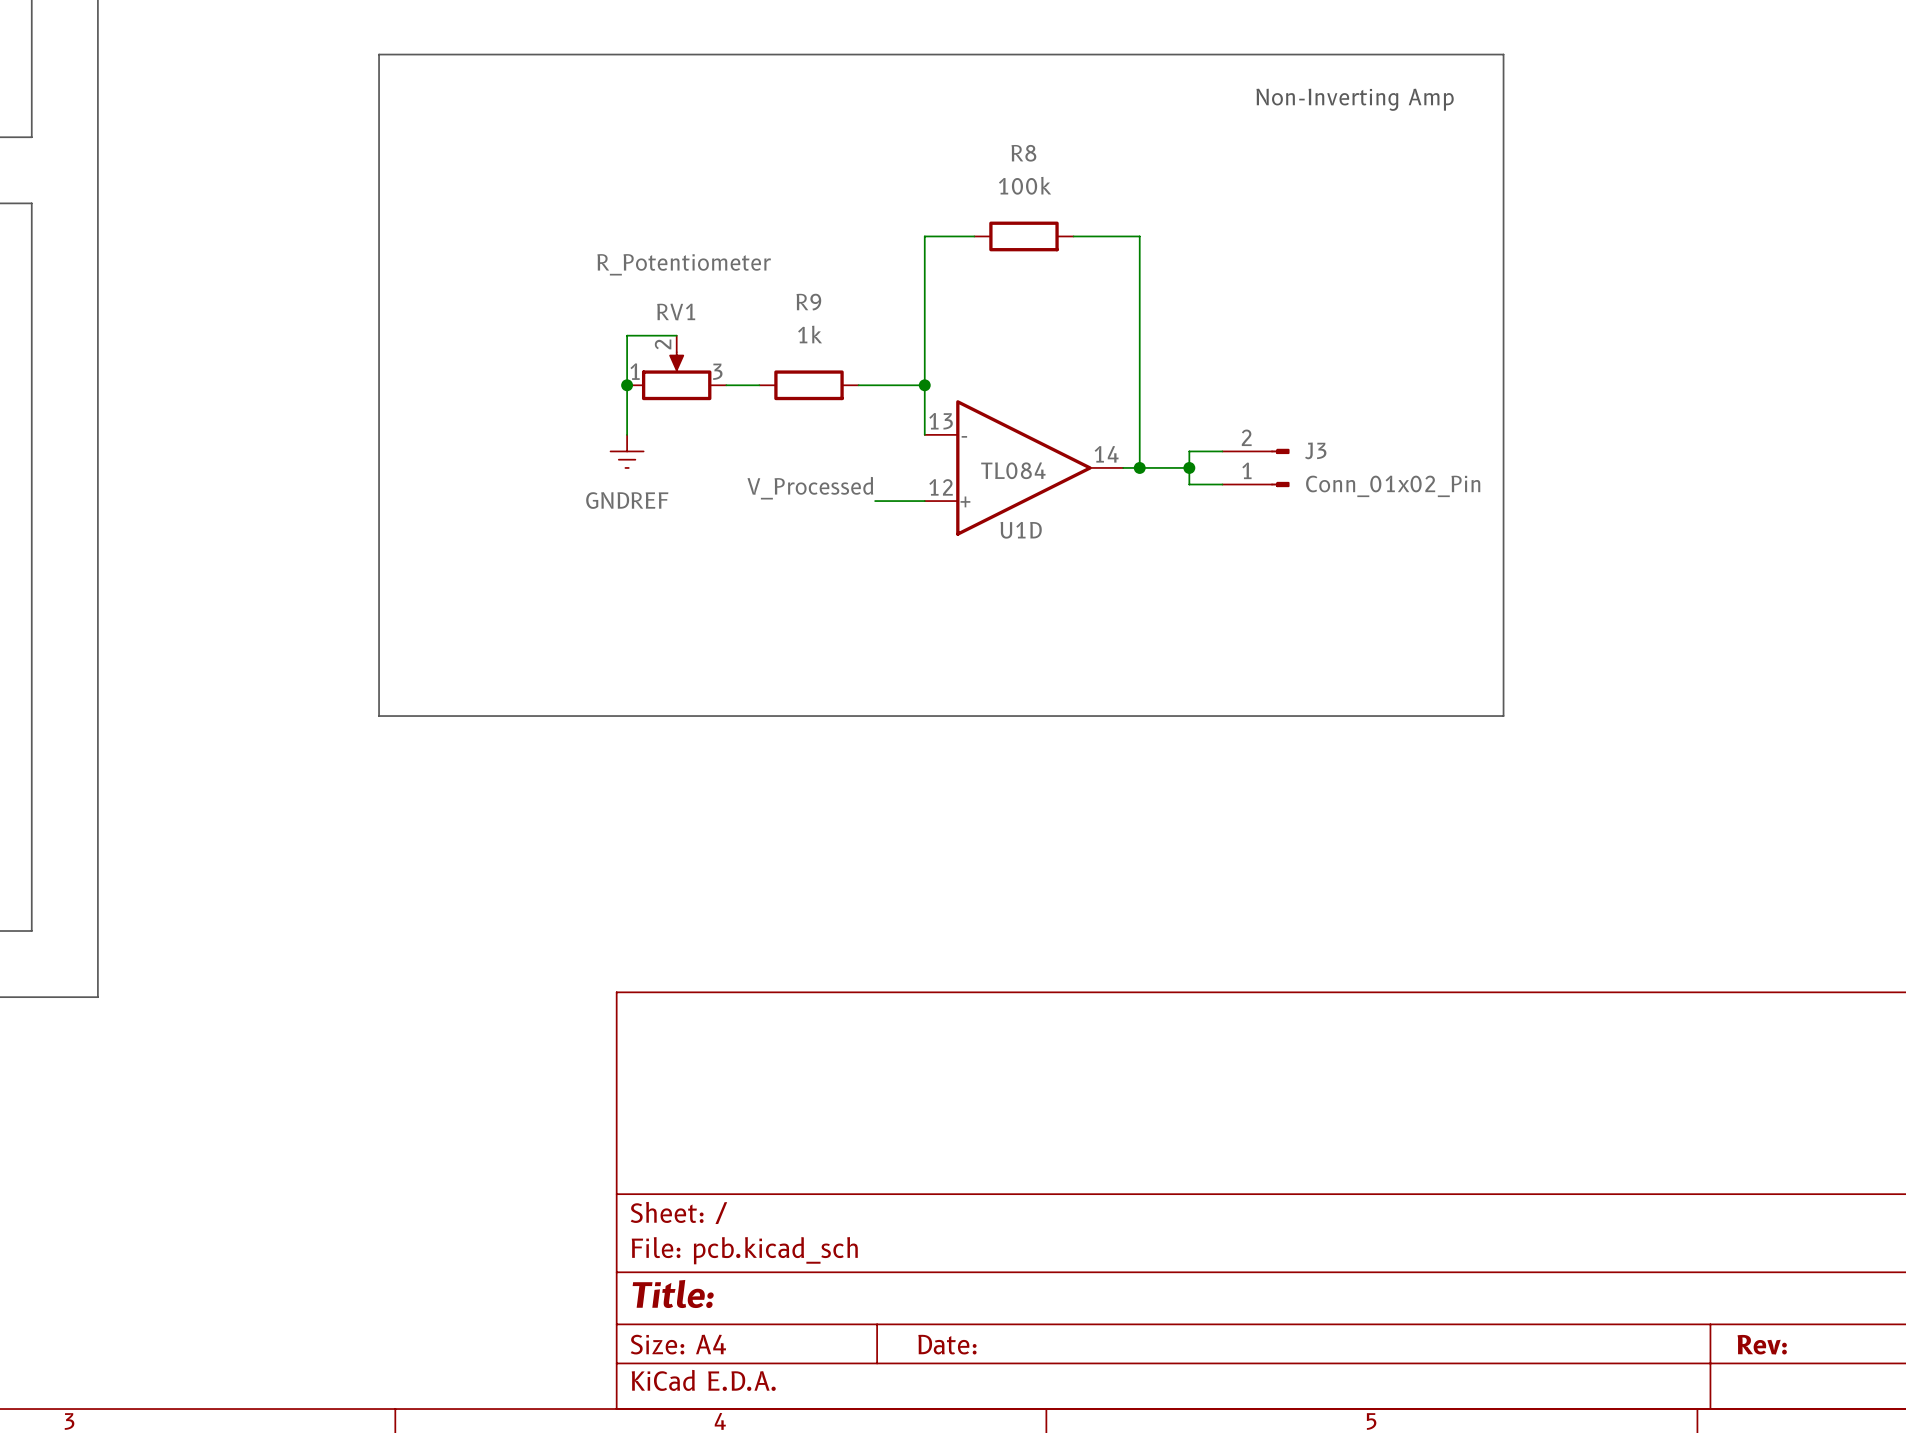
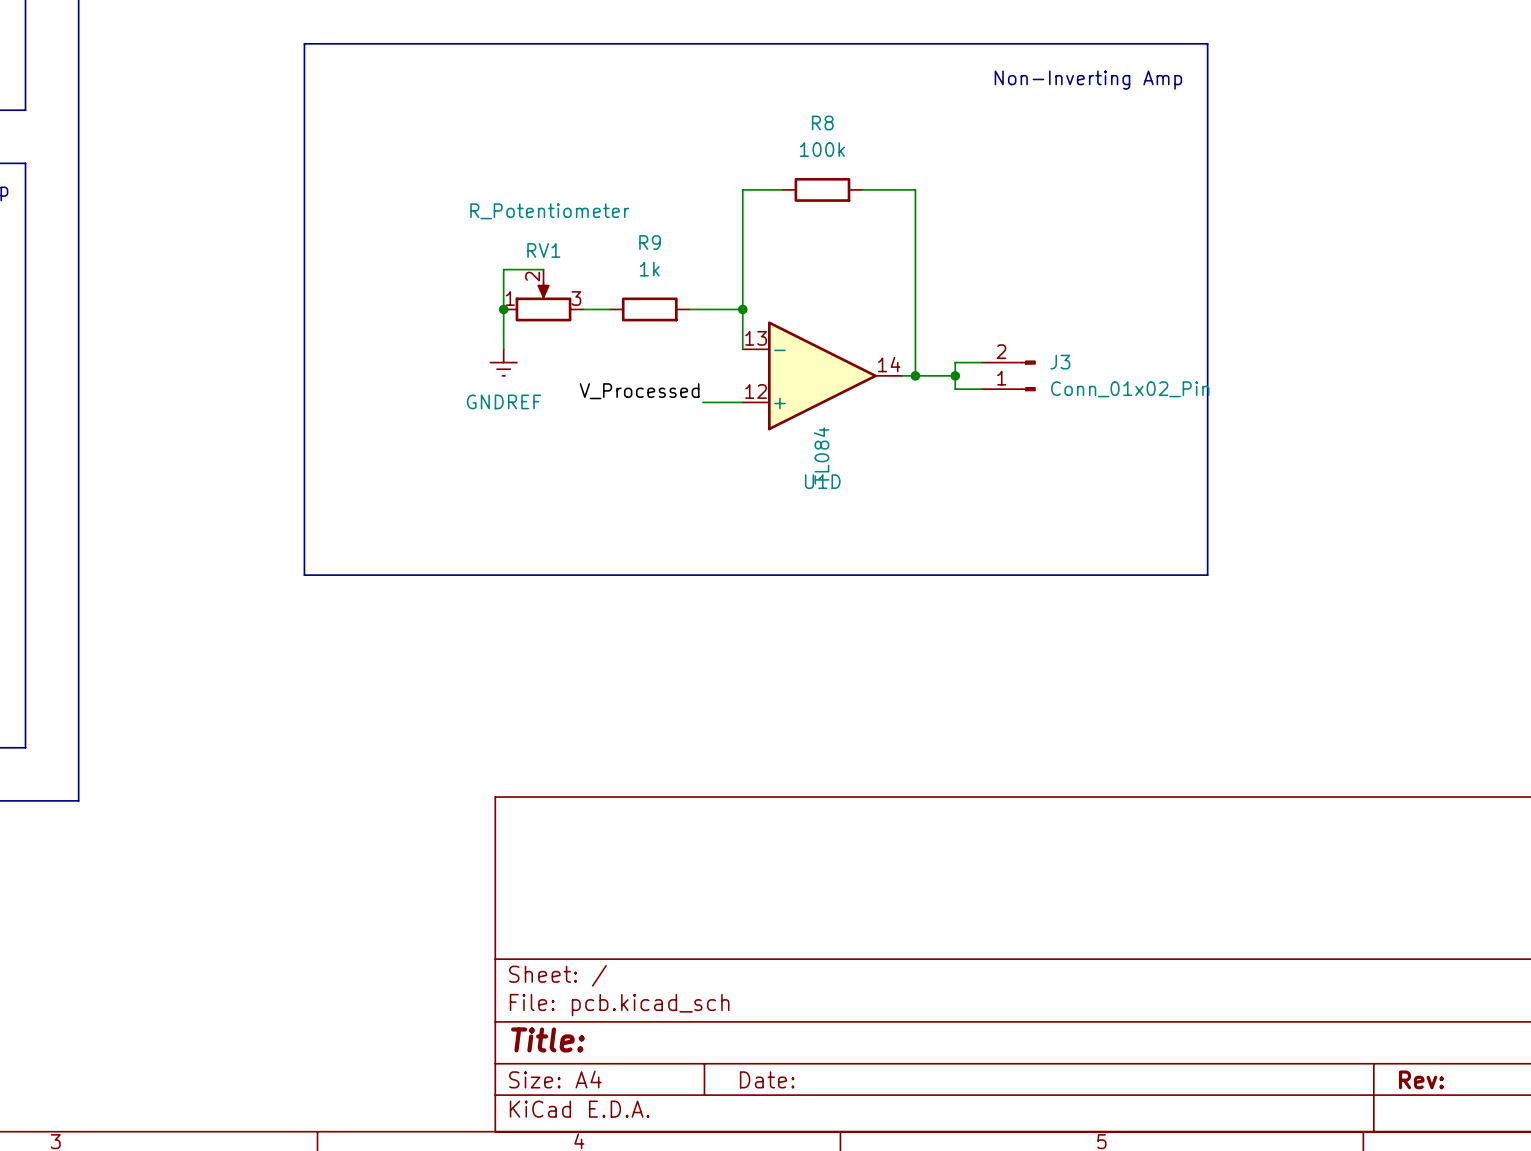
U1D value rotation: 0° (1013, 470) -> 90° counterclockwise (821, 455)
U1D value position: TL084 (1013, 470) -> TL084 (821, 455)
U1D name position: U1D (1021, 530) -> U1D (822, 481)

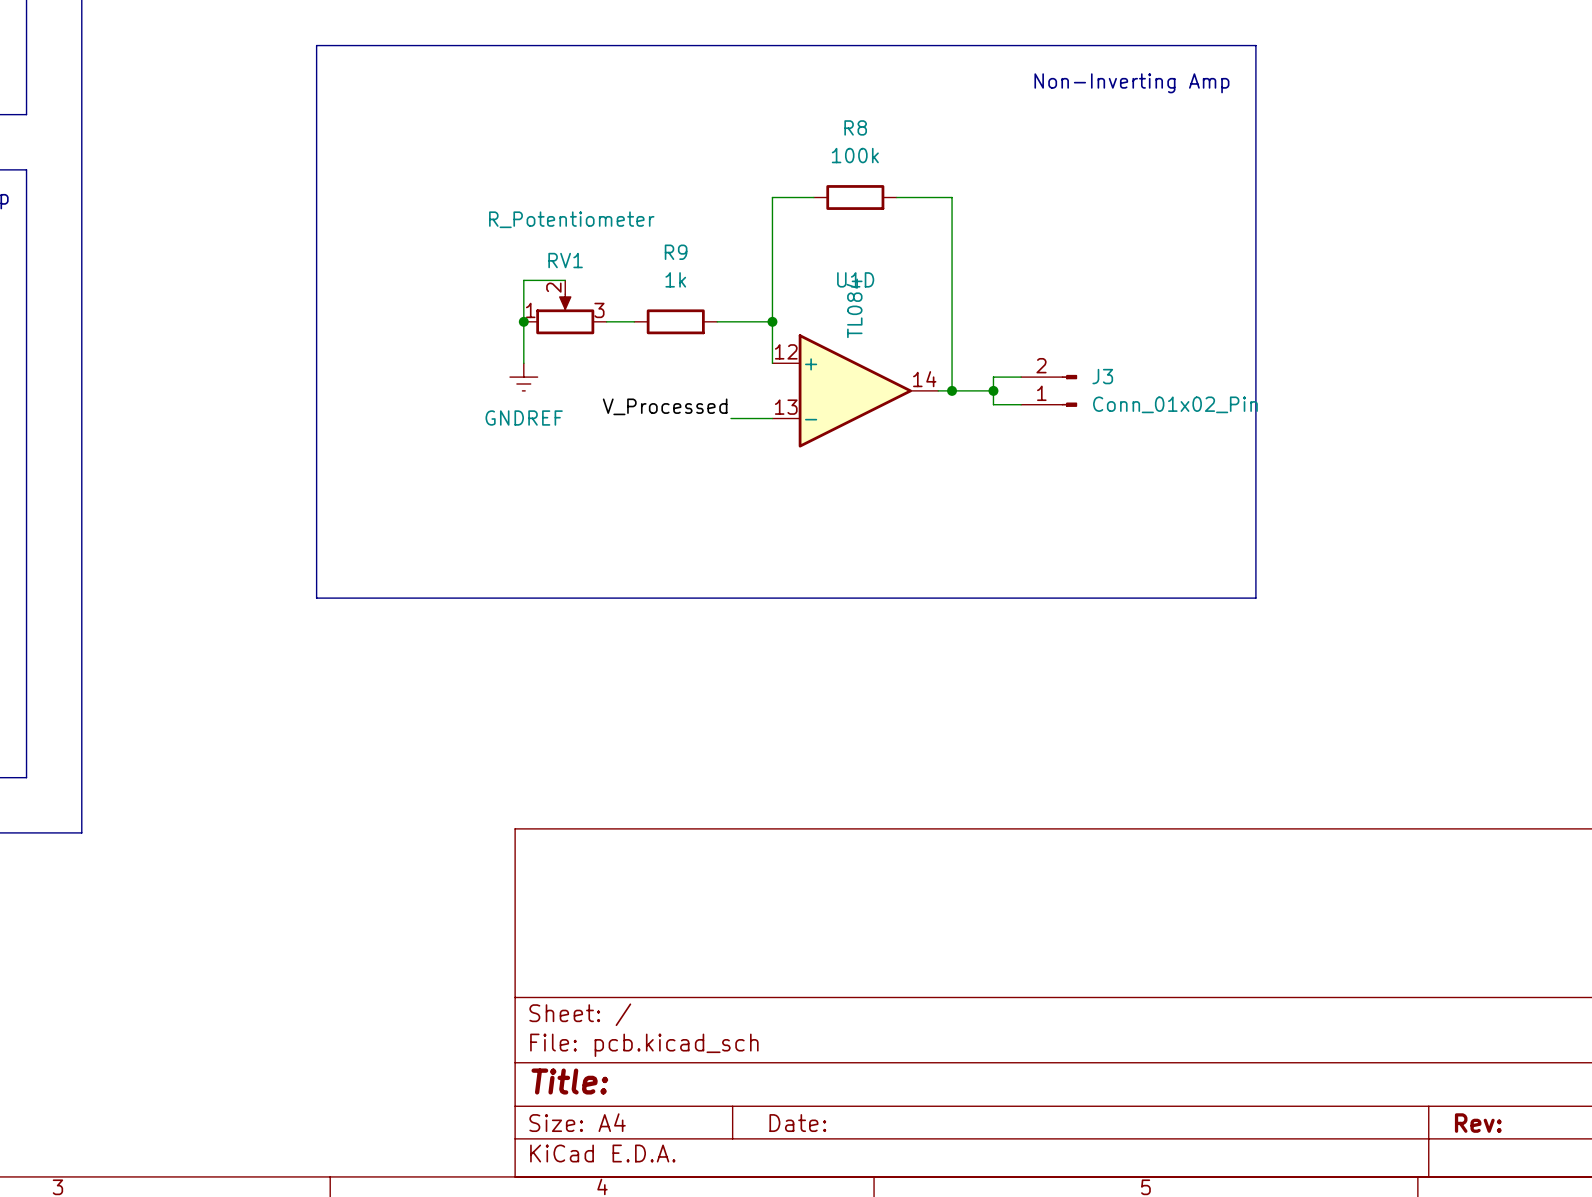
U1D flip: as is (822, 375) -> up-down (855, 390)

